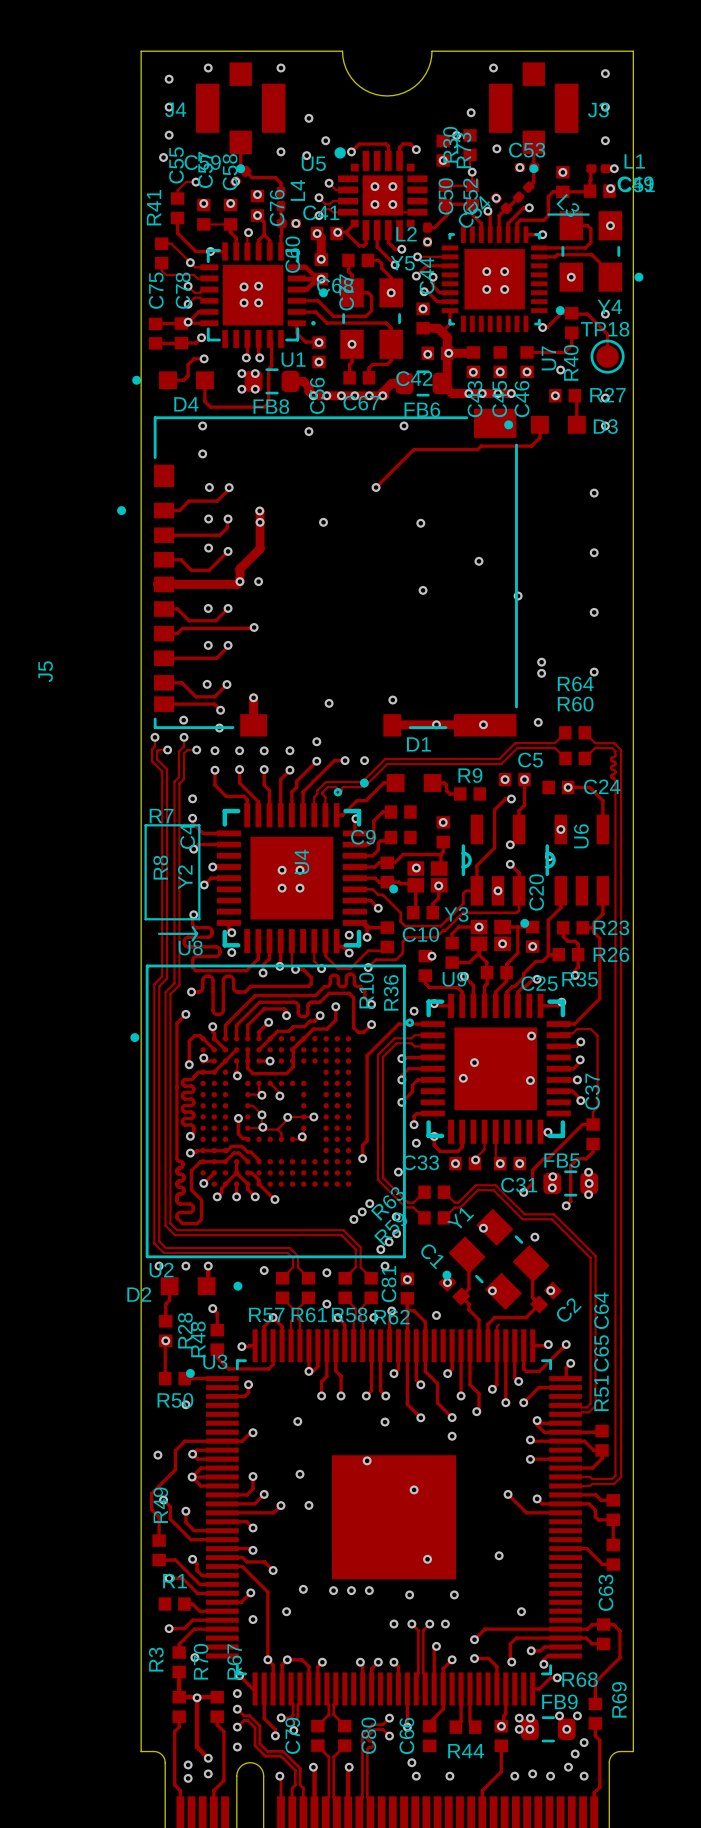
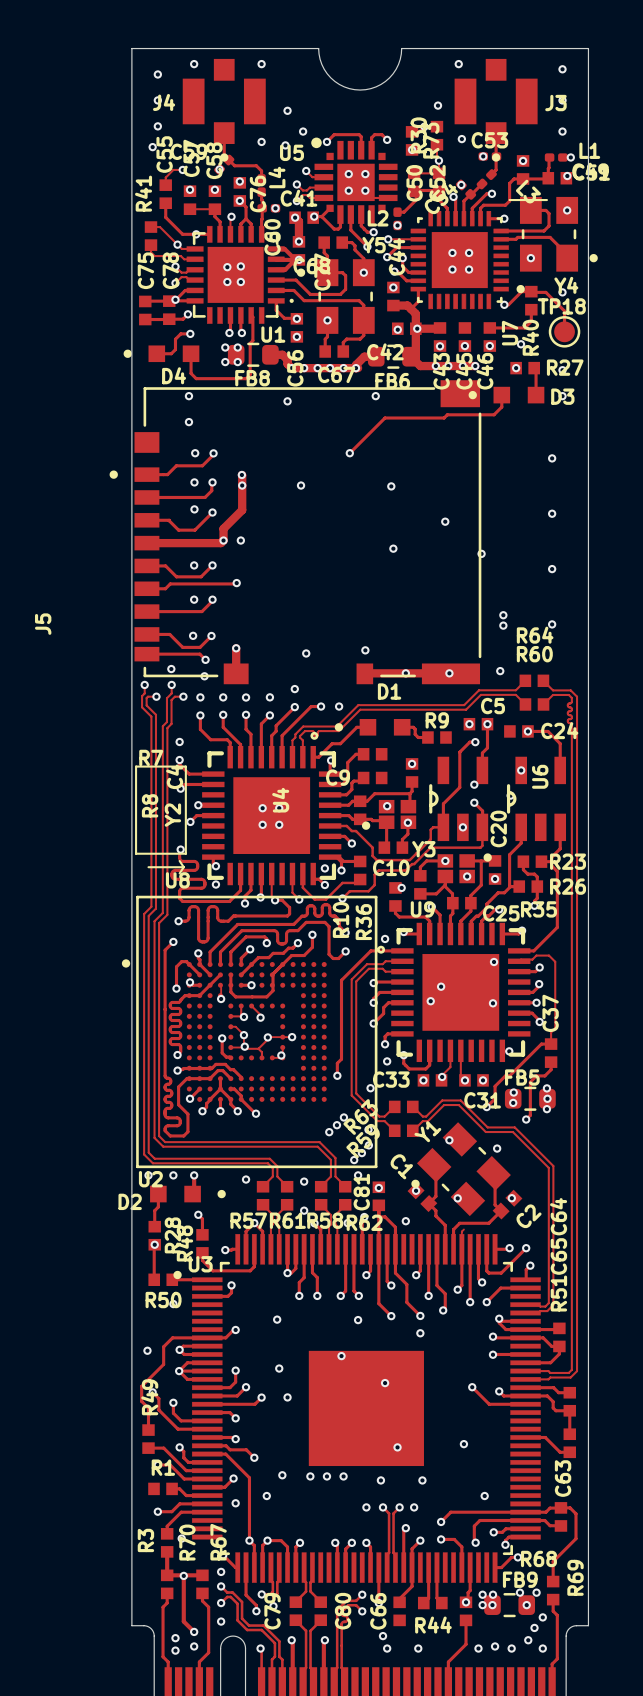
J5 footprint: [117, 408, 518, 737] -> [109, 380, 482, 685]

